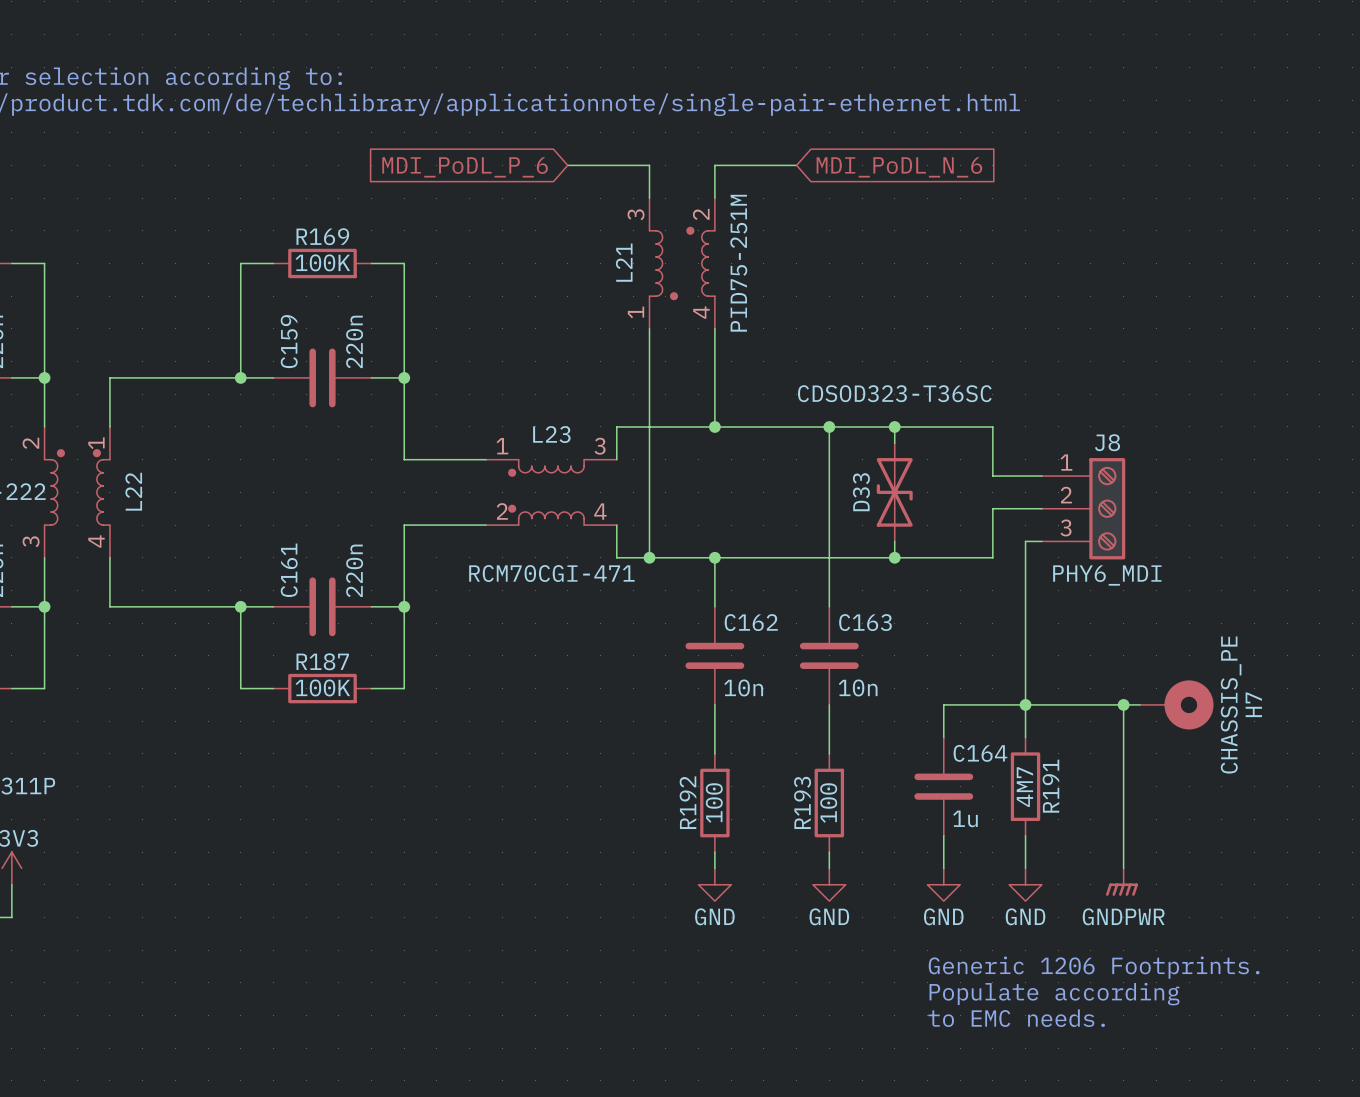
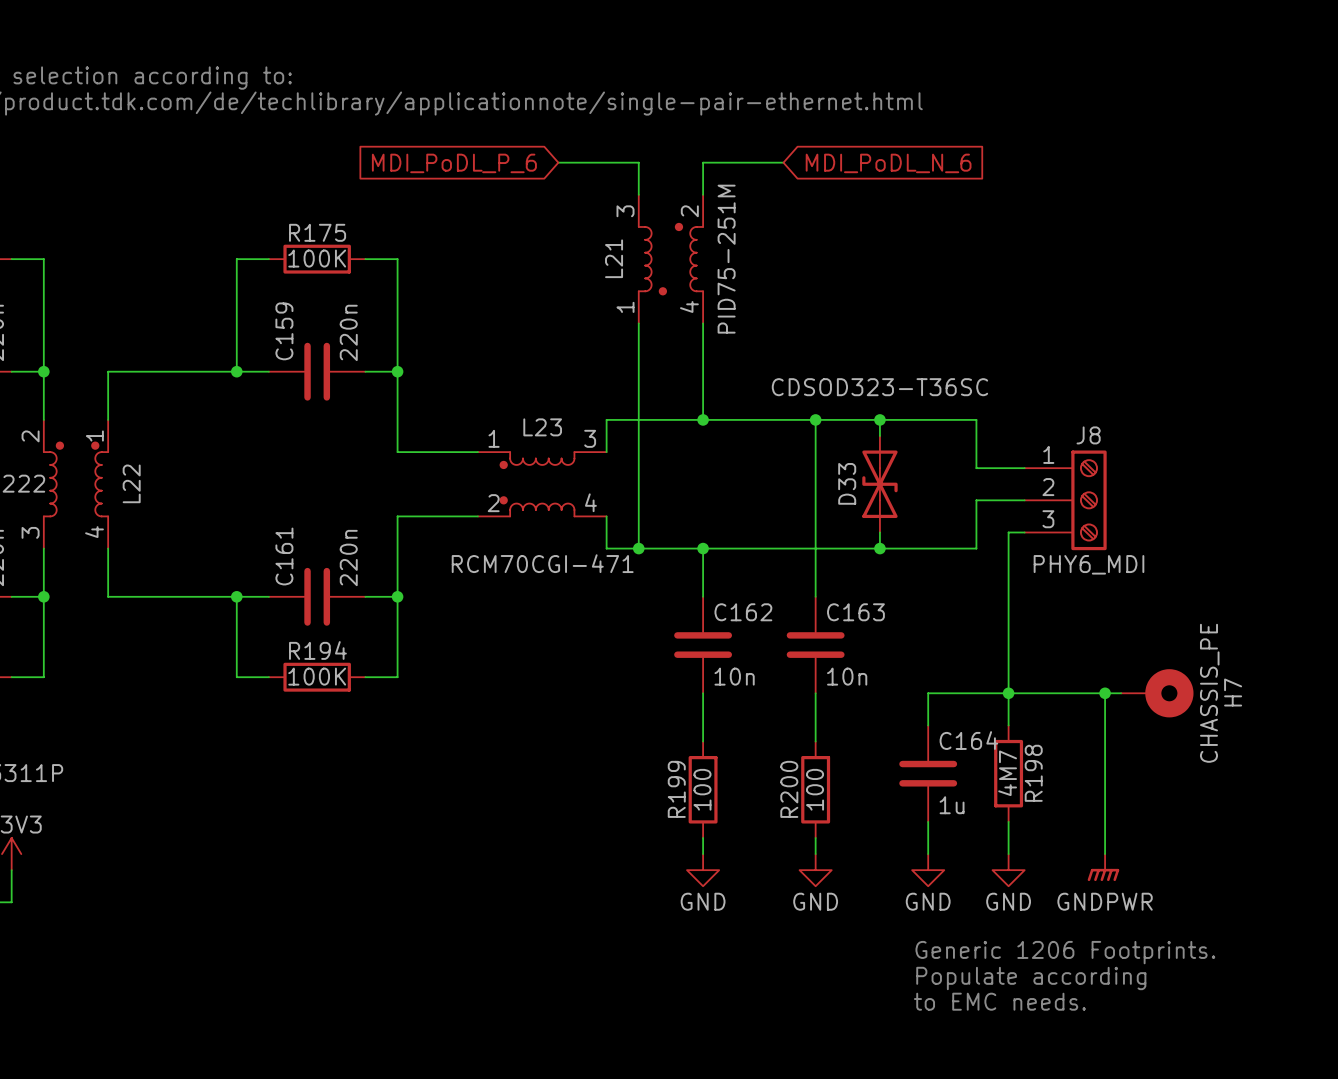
R169 name: R169 (322, 236) -> R175 (317, 232)
R187 name: R187 (322, 661) -> R194 (317, 650)
R191 name: R191 (1050, 786) -> R198 (1033, 773)
R192 name: R192 (687, 802) -> R199 (676, 789)
R193 name: R193 (802, 802) -> R200 (789, 789)

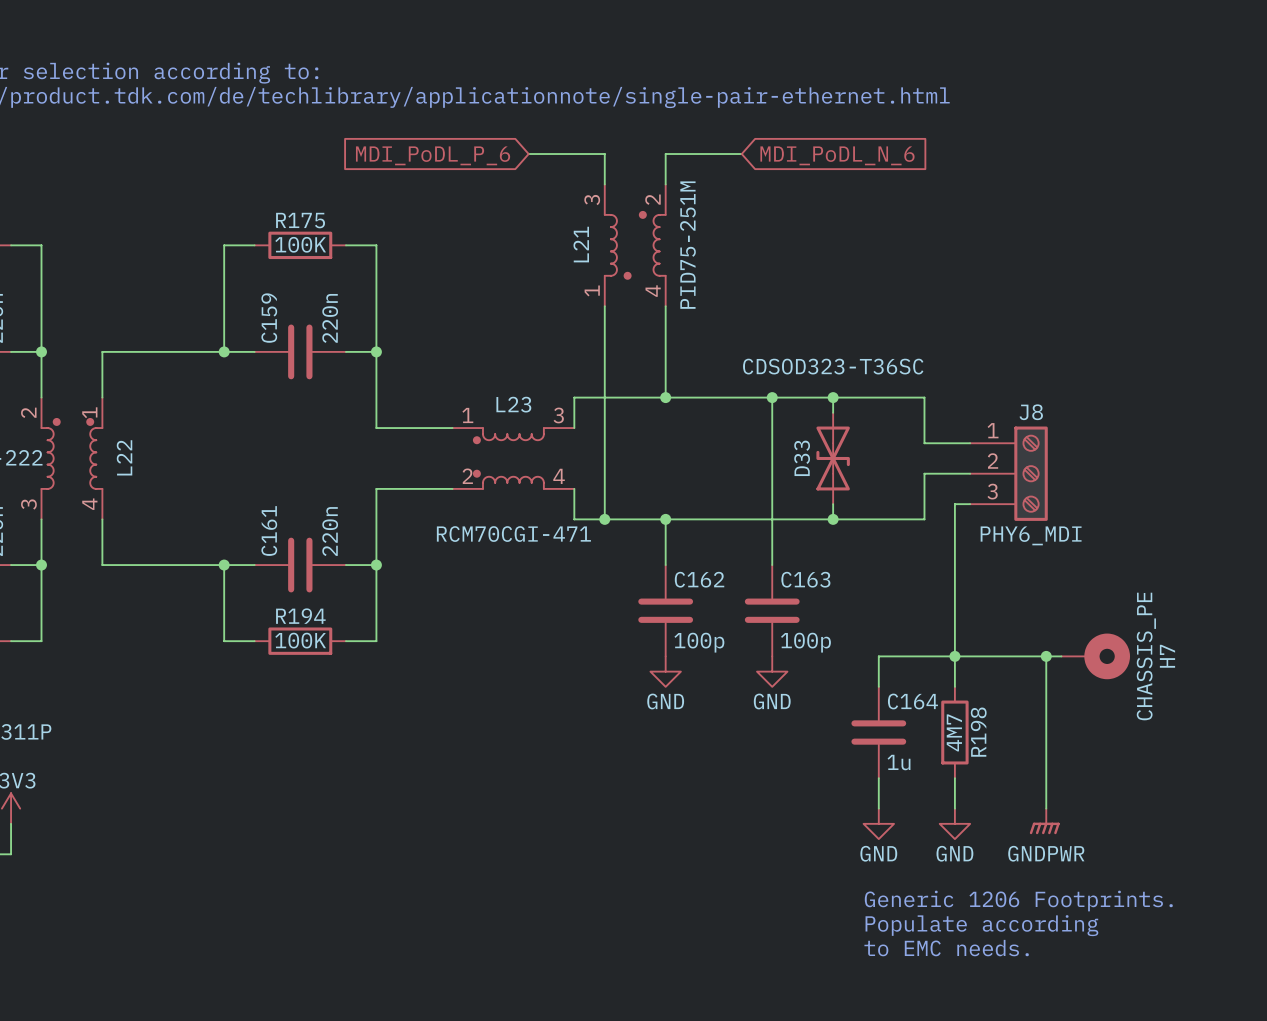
C162 value: 10n (734, 676) -> 100p (699, 642)
C163 value: 10n (847, 676) -> 100p (805, 642)
wire: (703, 693) (703, 741) -> none
wire: (815, 693) (815, 741) -> none
power symbol: none -> GND (665, 671)
power symbol: none -> GND (772, 671)
R199: 100 (703, 789) -> none
R200: 100 (815, 789) -> none
wire: (703, 838) (703, 854) -> none
wire: (815, 838) (815, 854) -> none
power symbol: GND (703, 870) -> none
power symbol: GND (815, 870) -> none

